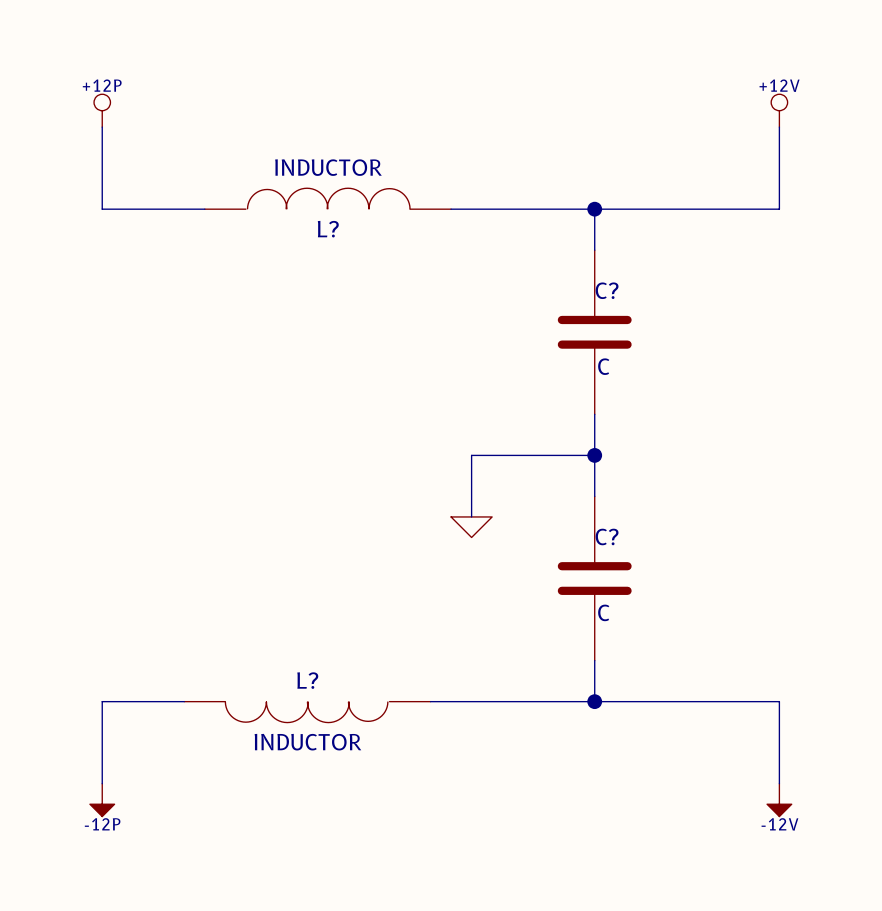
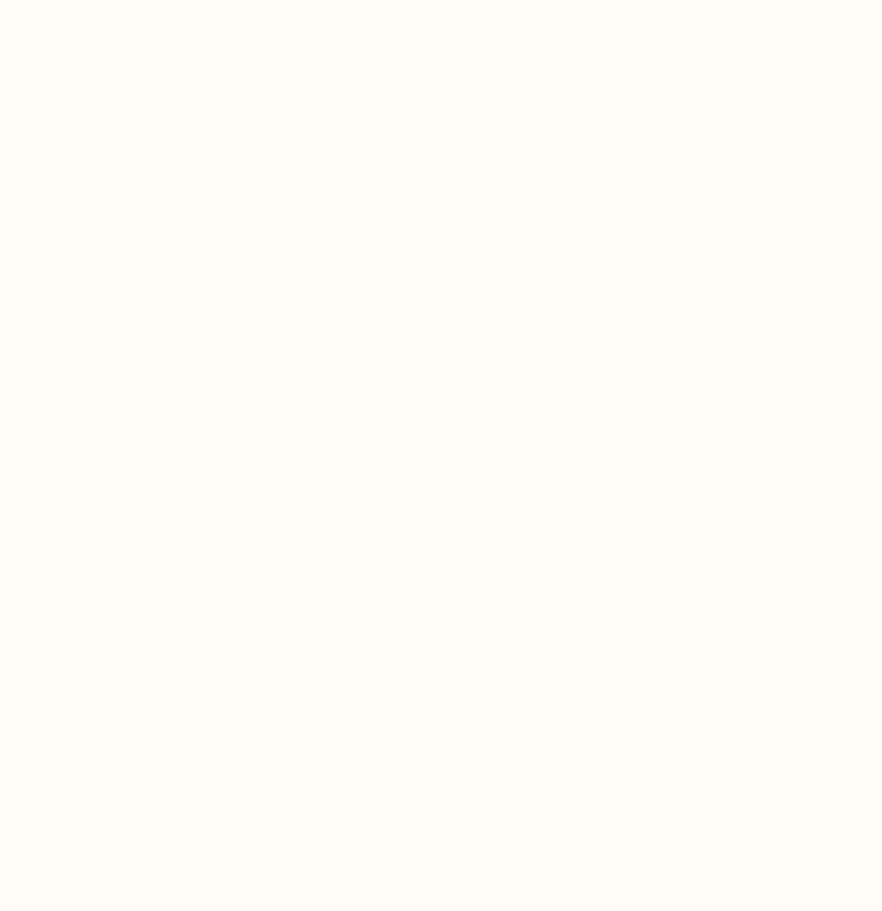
power symbol: +12P (102, 110) -> none
power symbol: +12V (779, 110) -> none
wire: (102, 127) (102, 209) (204, 209) -> none
wire: (779, 127) (779, 209) (451, 209) -> none
L?: INDUCTOR (327, 198) -> none
wire: (594, 209) (594, 250) -> none
junction: (594, 209) -> none
C?: C (594, 332) -> none
wire: (594, 414) (594, 496) -> none
wire: (594, 455) (471, 455) (471, 516) -> none
junction: (594, 455) -> none
power symbol: (471, 527) -> none
C?: C (594, 578) -> none
wire: (594, 660) (594, 701) -> none
wire: (184, 701) (102, 701) (102, 783) -> none
wire: (430, 701) (779, 701) (779, 783) -> none
junction: (594, 701) -> none
L?: INDUCTOR (307, 712) -> none
power symbol: -12P (102, 800) -> none
power symbol: -12V (779, 800) -> none

